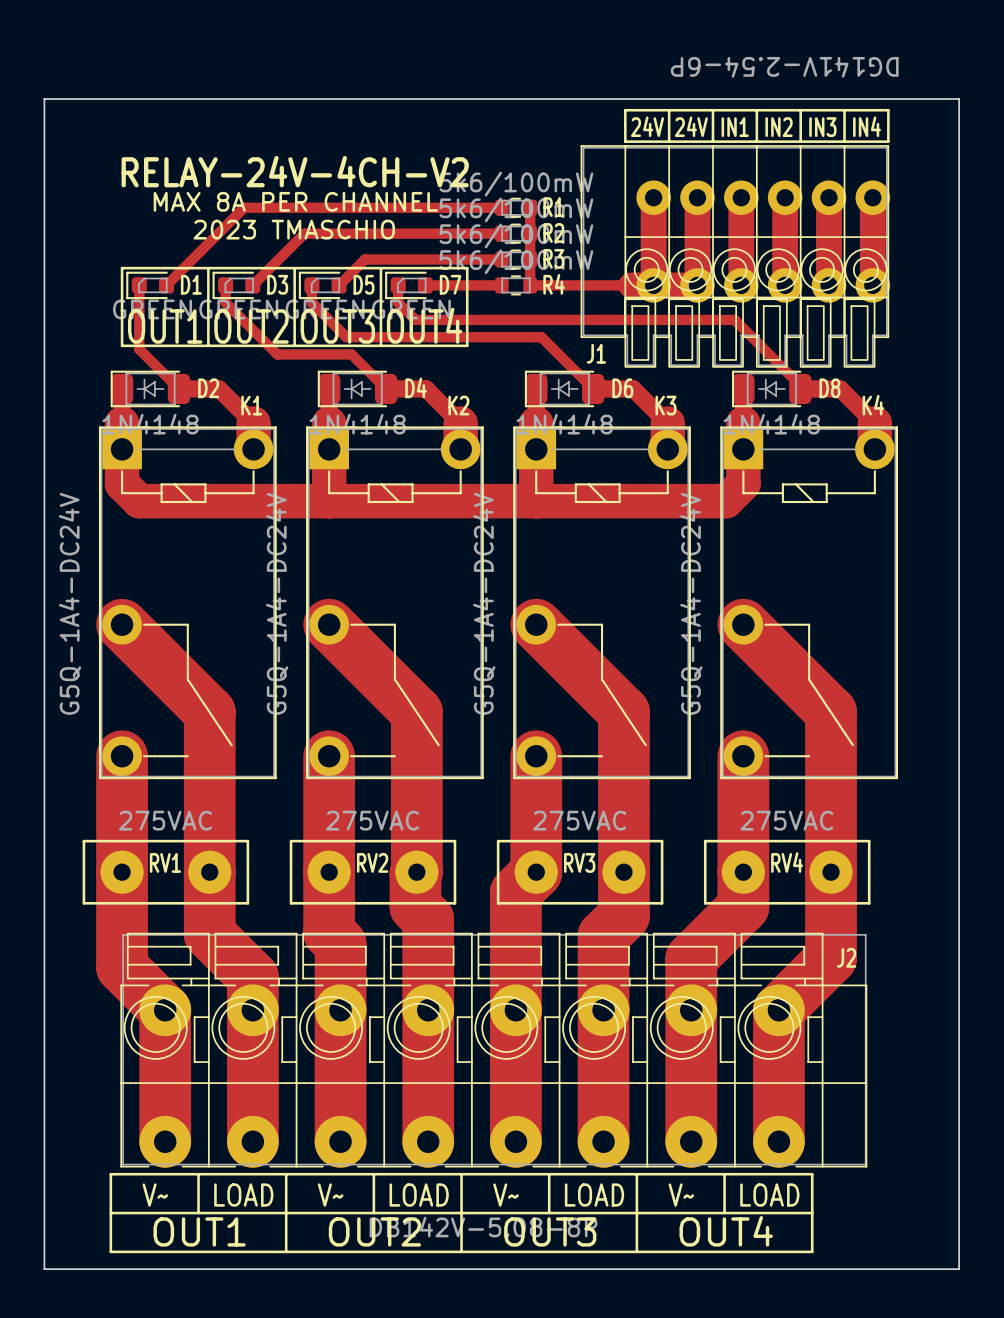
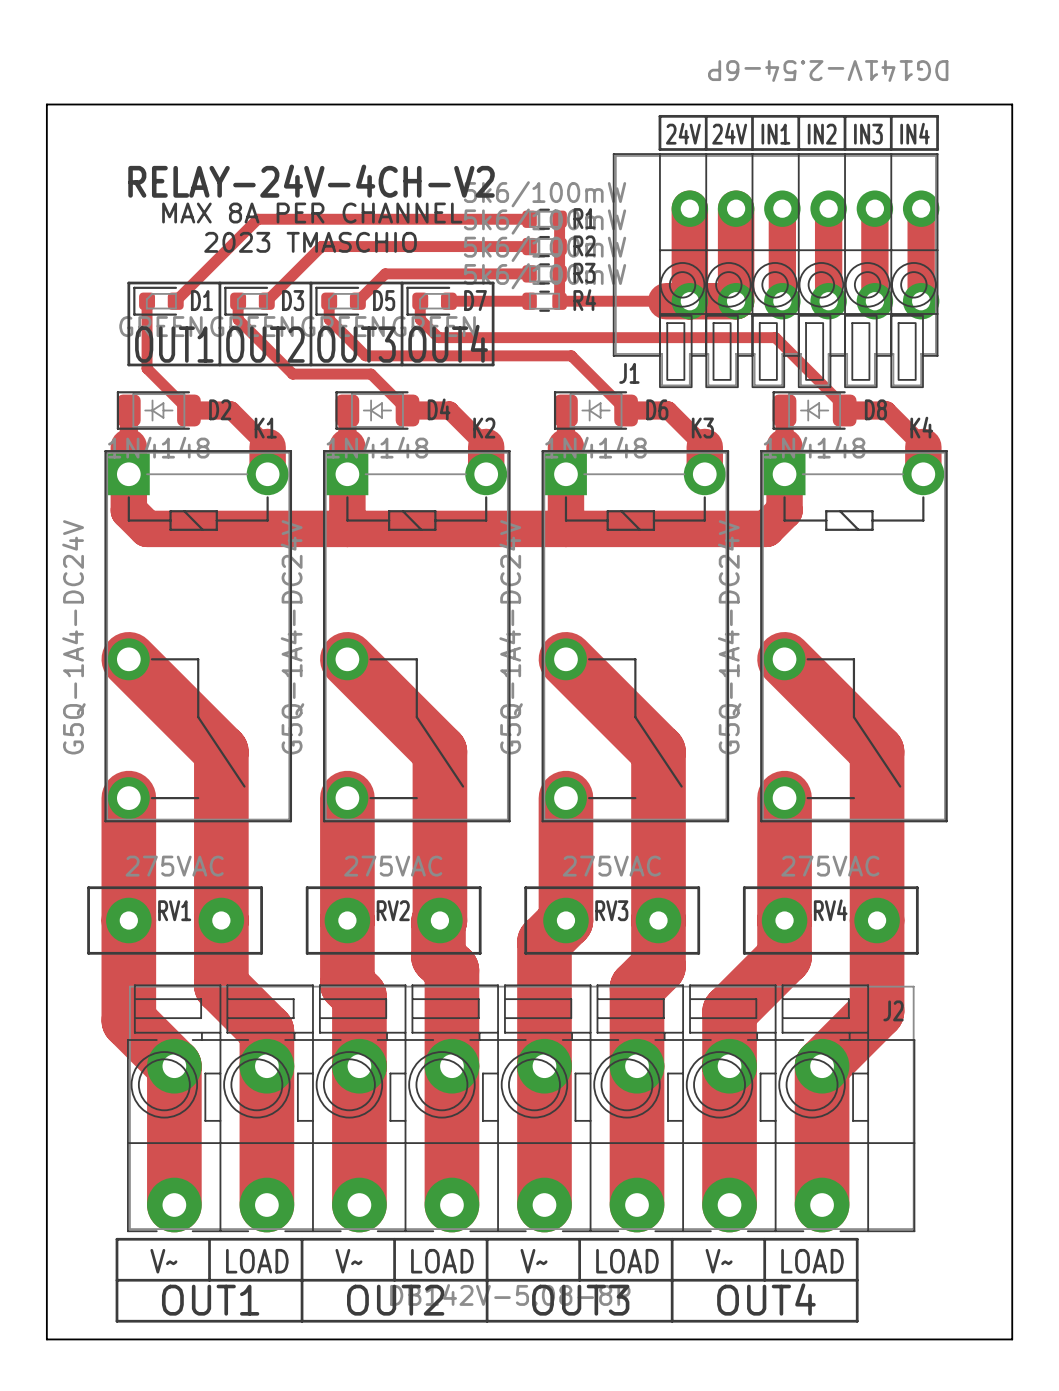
track width: thin (653, 197) (653, 285) -> thick (689, 208) (689, 301)
track width: thin (697, 197) (697, 285) (631, 285) -> thick (736, 208) (736, 301) (666, 301)

